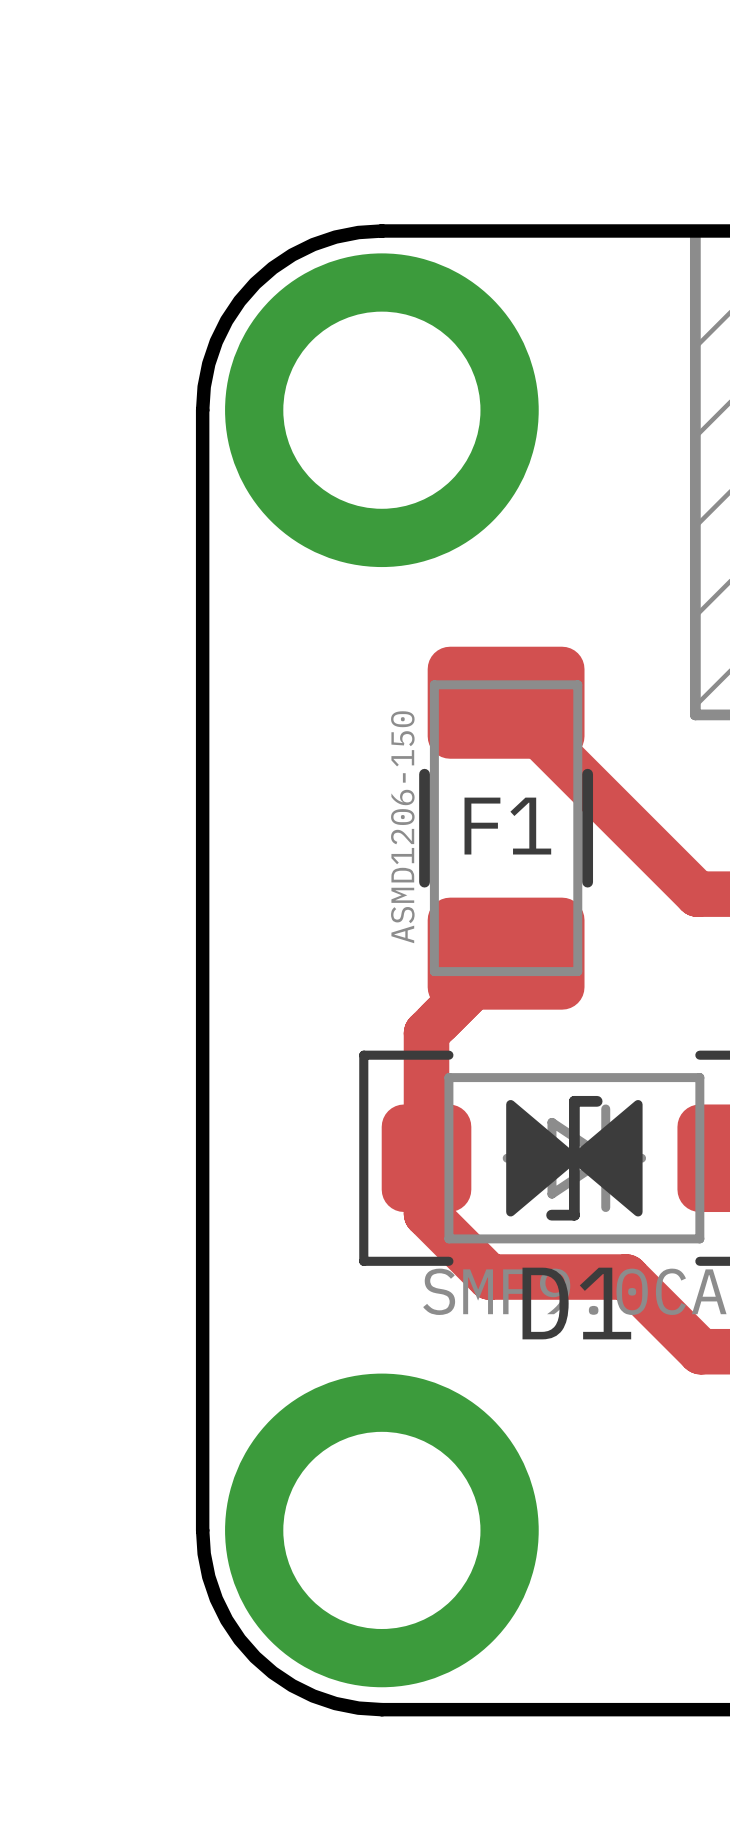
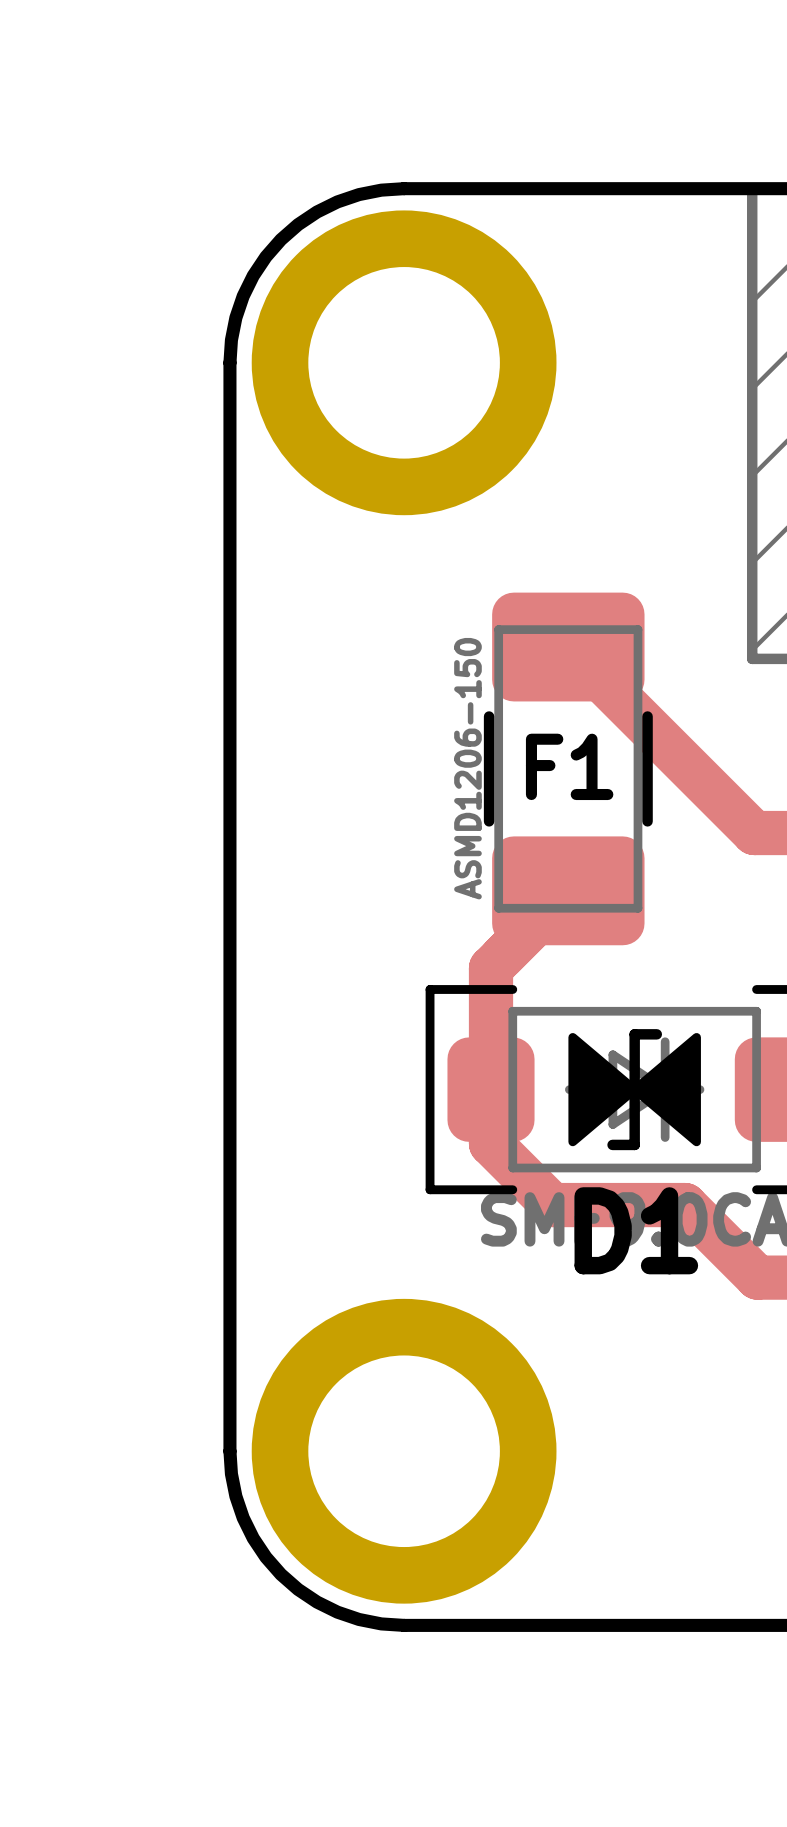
board edge: (381, 230) (358, 232) (335, 237) (313, 244) (292, 254) (272, 268) (255, 283) (239, 301) (226, 320) (216, 341) (208, 363) (204, 386) (202, 410) (202, 1530) (204, 1553) (208, 1576) (216, 1599) (226, 1620) (239, 1639) (255, 1657) (272, 1672) (292, 1685) (313, 1696) (335, 1703) (358, 1708) (381, 1709) -> (447, 188) (381, 190) (359, 194) (337, 201) (298, 224) (265, 256) (253, 275) (235, 317) (229, 362) (231, 1473) (235, 1496) (253, 1538) (265, 1557) (298, 1589) (337, 1612) (359, 1619) (381, 1623) (447, 1625)
part position: (381, 410) -> (404, 362)
part position: (381, 1530) -> (404, 1451)

